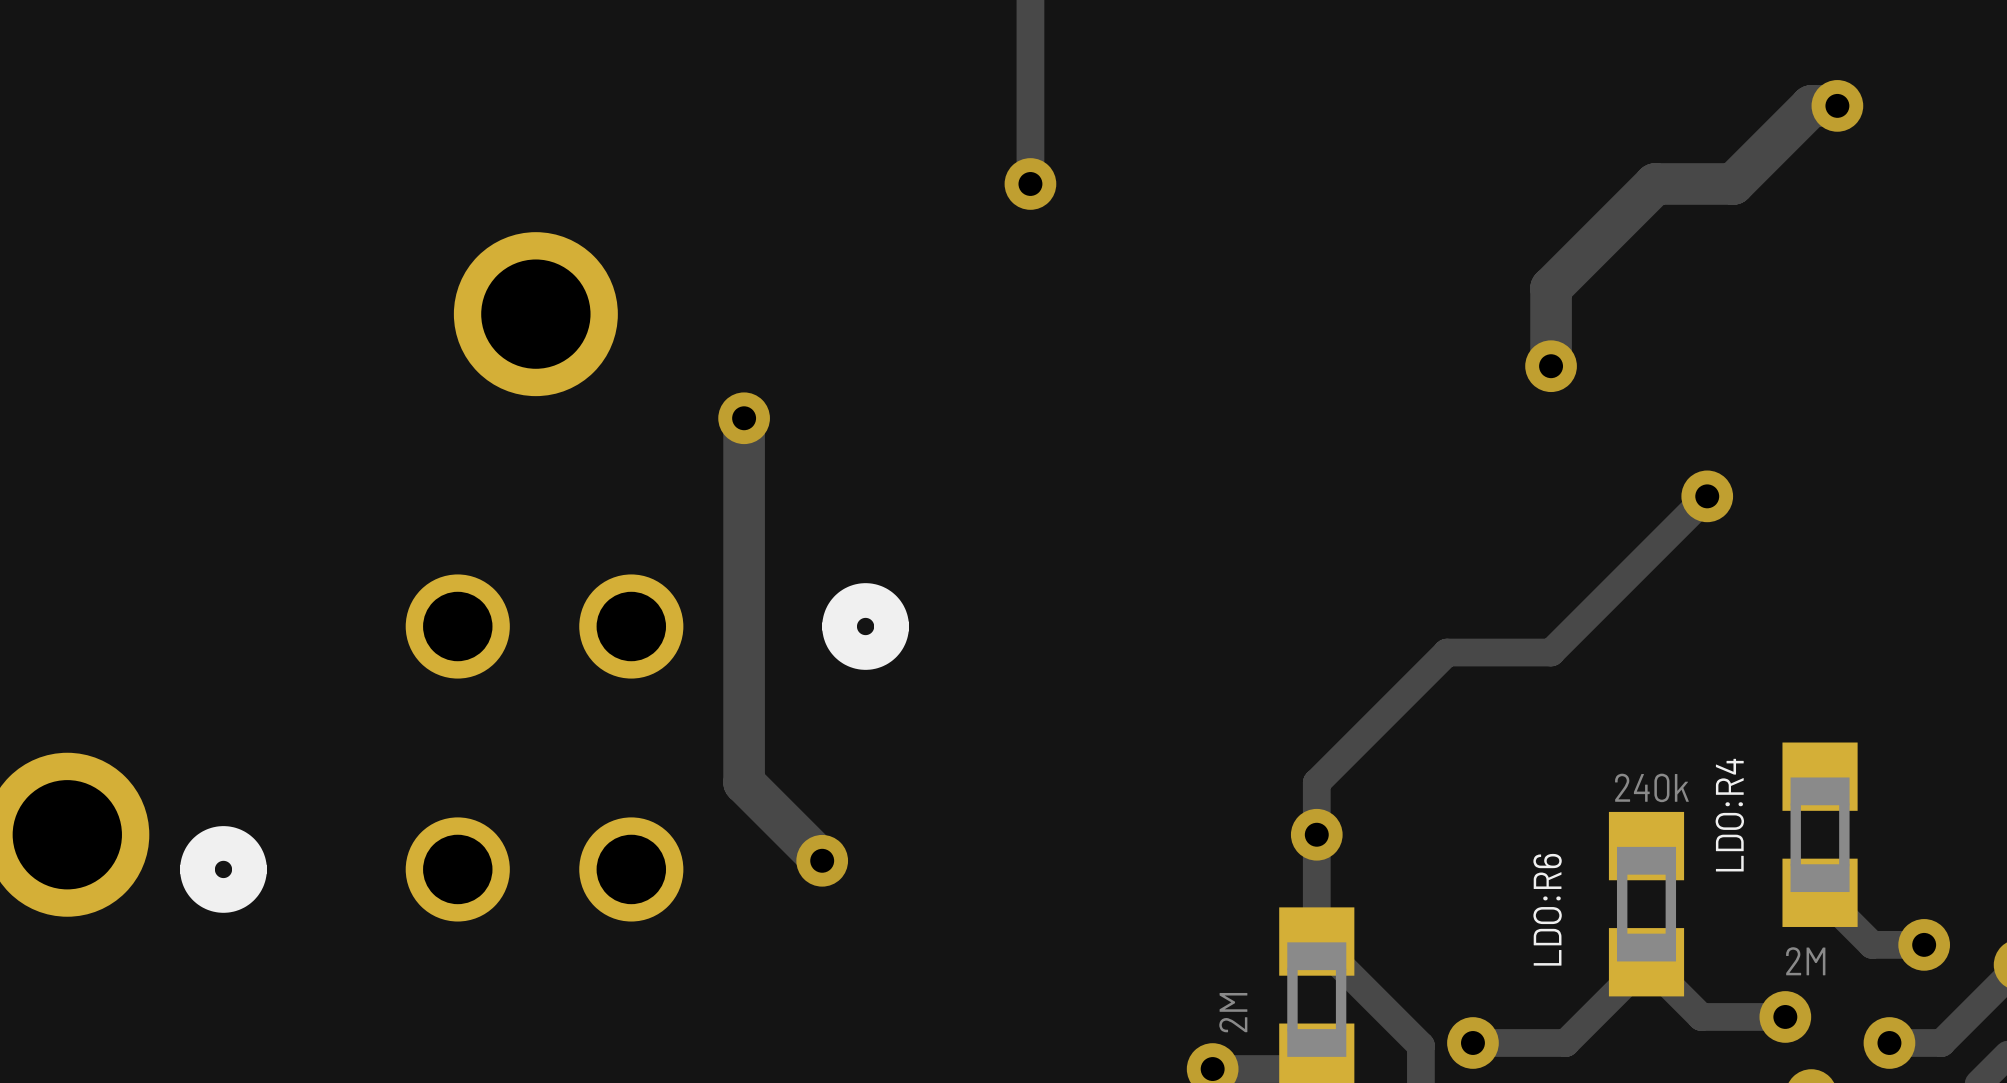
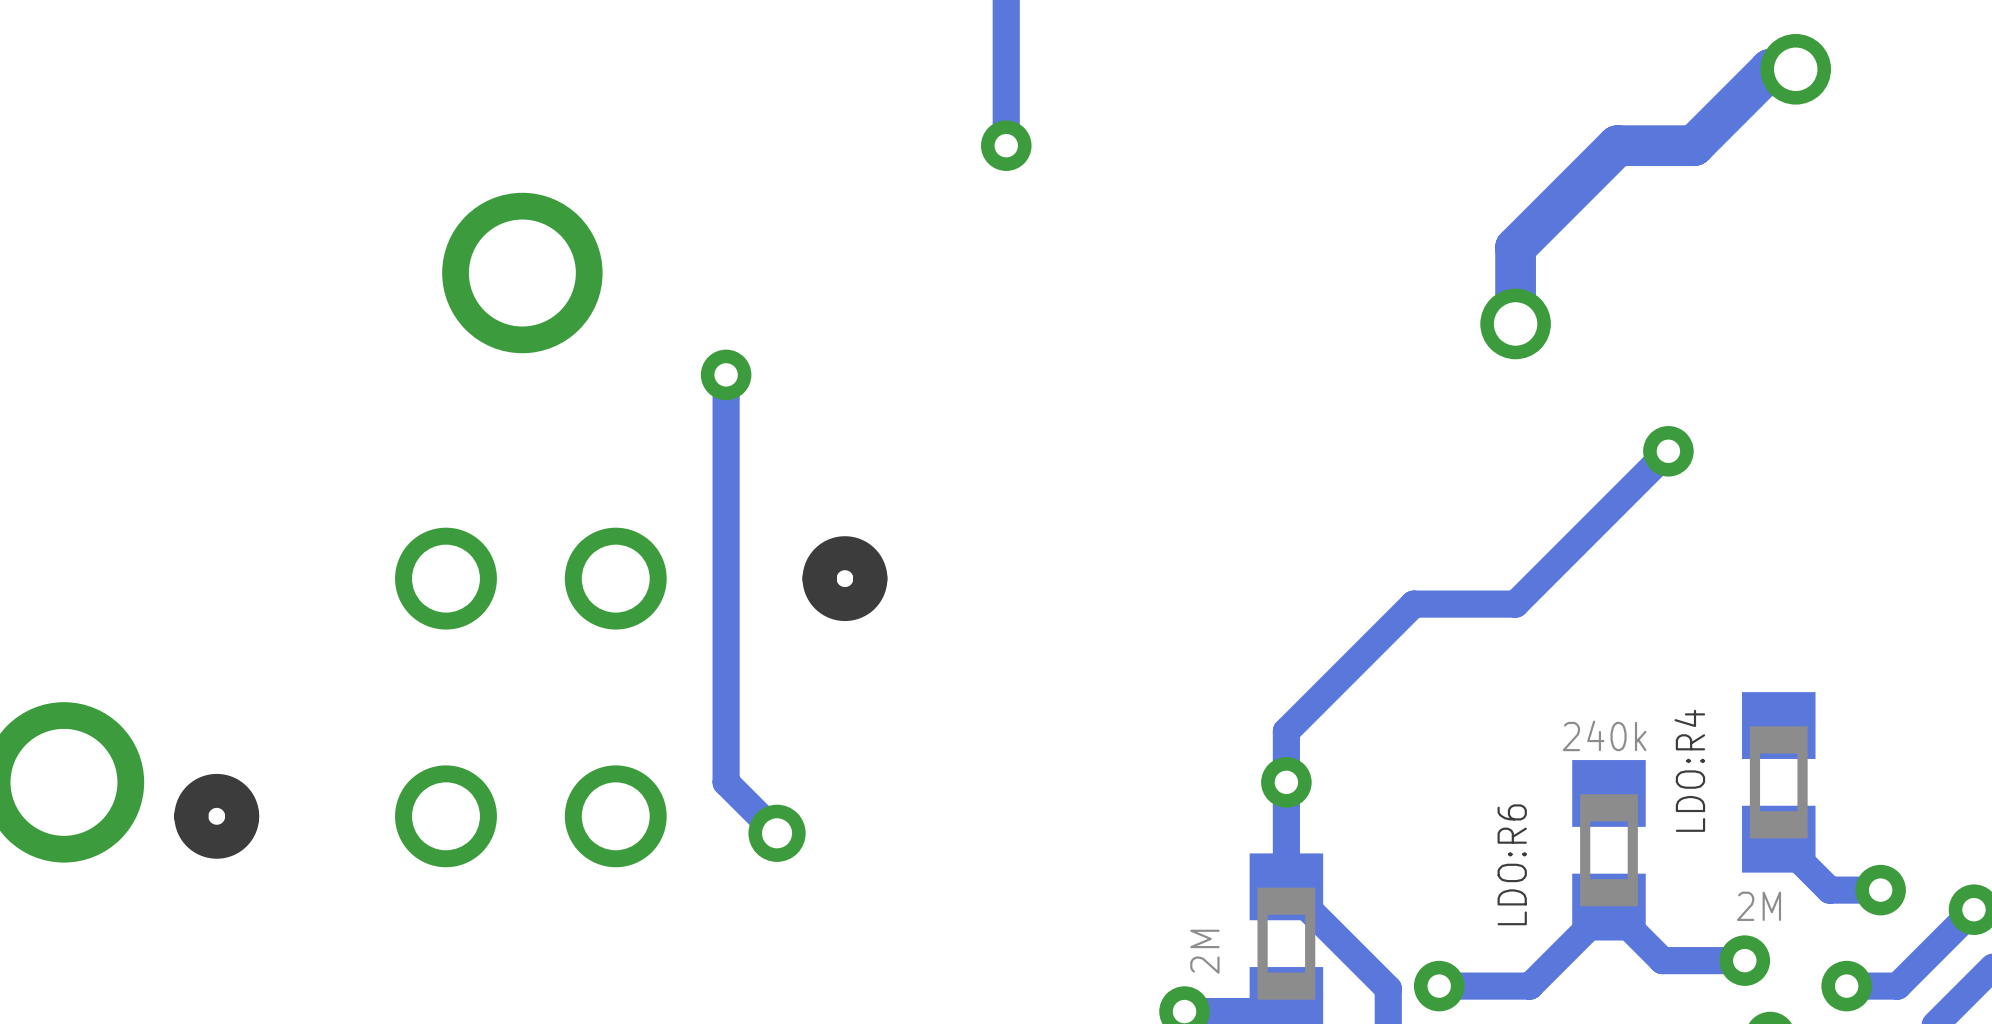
via size: [1811, 80, 1864, 132] -> [1760, 33, 1832, 105]
via size: [1525, 340, 1577, 393] -> [1480, 288, 1551, 360]
track width: thick (744, 418) (744, 782) -> thin (726, 374) (726, 731)
track: (744, 782) (822, 860) -> (726, 731) (726, 782) (777, 833)
via position: (822, 860) -> (777, 833)

